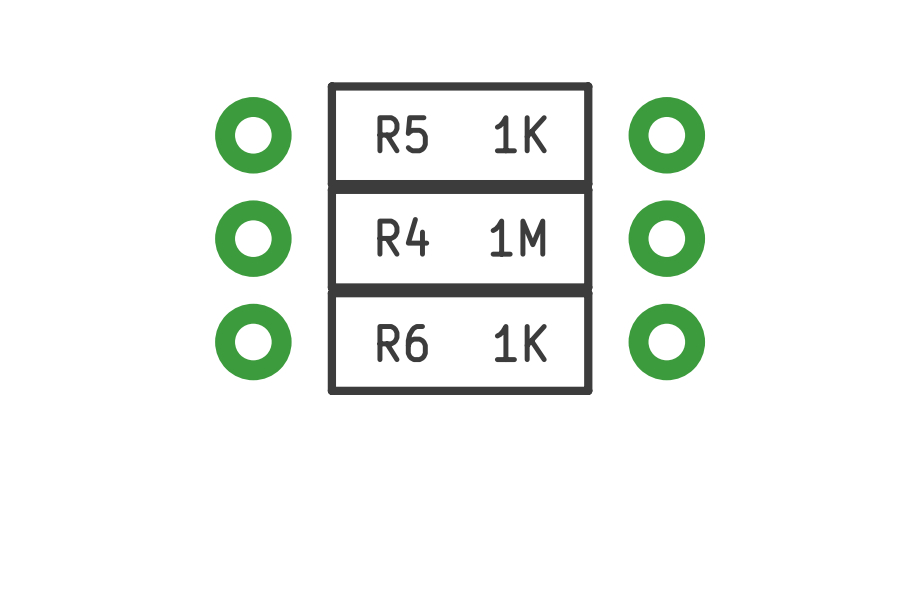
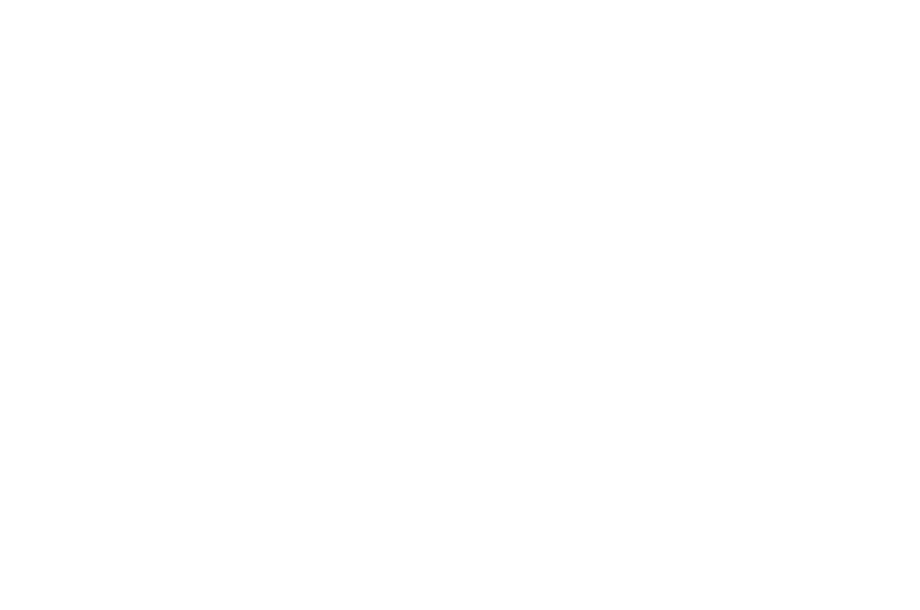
R5: 1K (460, 135) -> none
R4: 1M (460, 238) -> none
R6: 1K (460, 342) -> none

